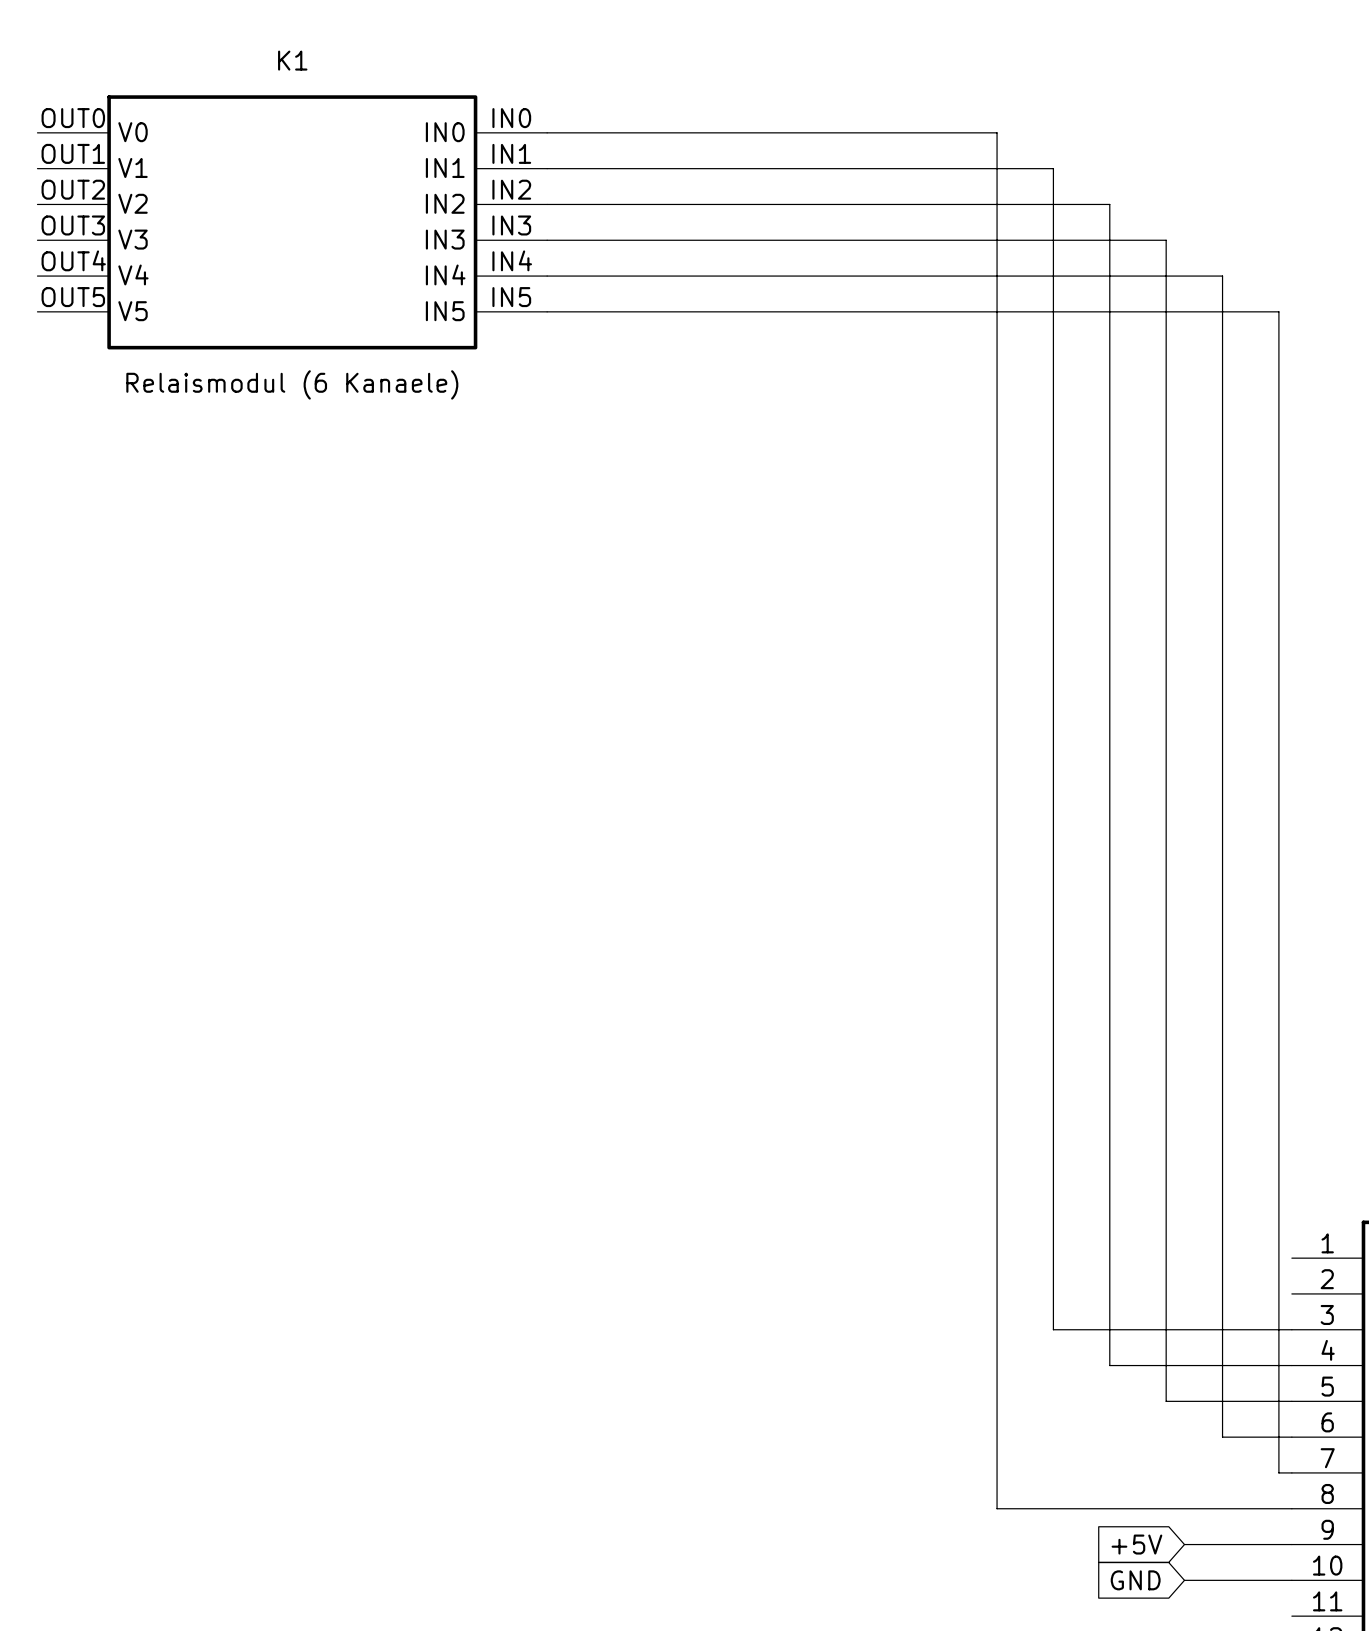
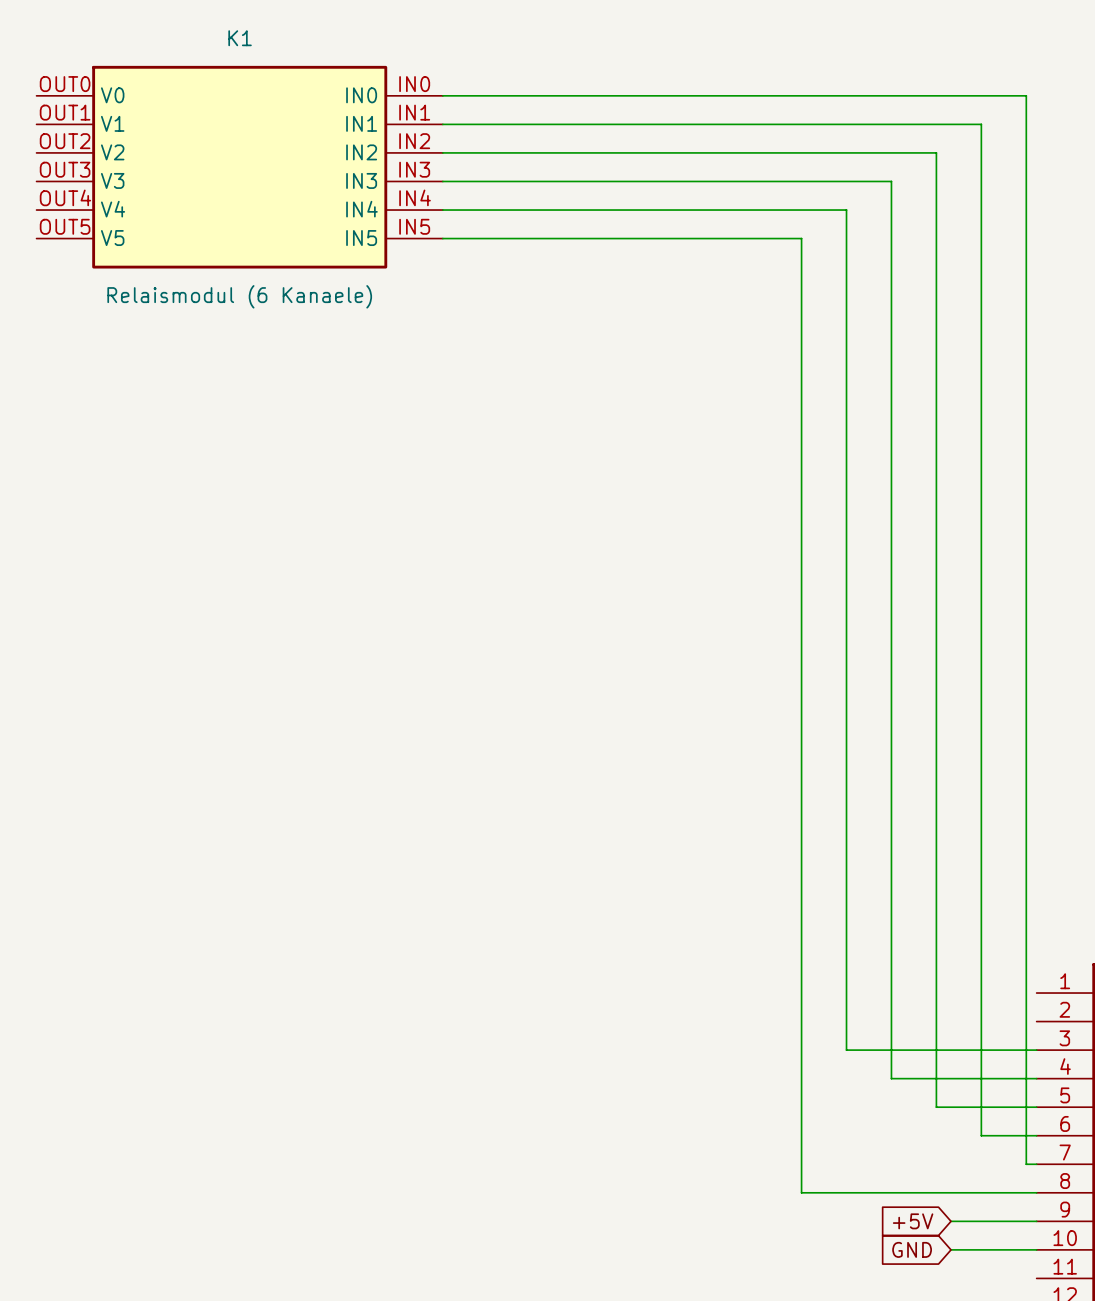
wire: (997, 132) (997, 311) (1278, 311) -> (801, 95) (1026, 95) (1026, 238)
wire: (1053, 168) (1053, 276) (1222, 276) -> (846, 124) (981, 124) (981, 210)
wire: (1109, 204) (1109, 240) (1166, 240) -> (891, 152) (936, 152) (936, 181)

